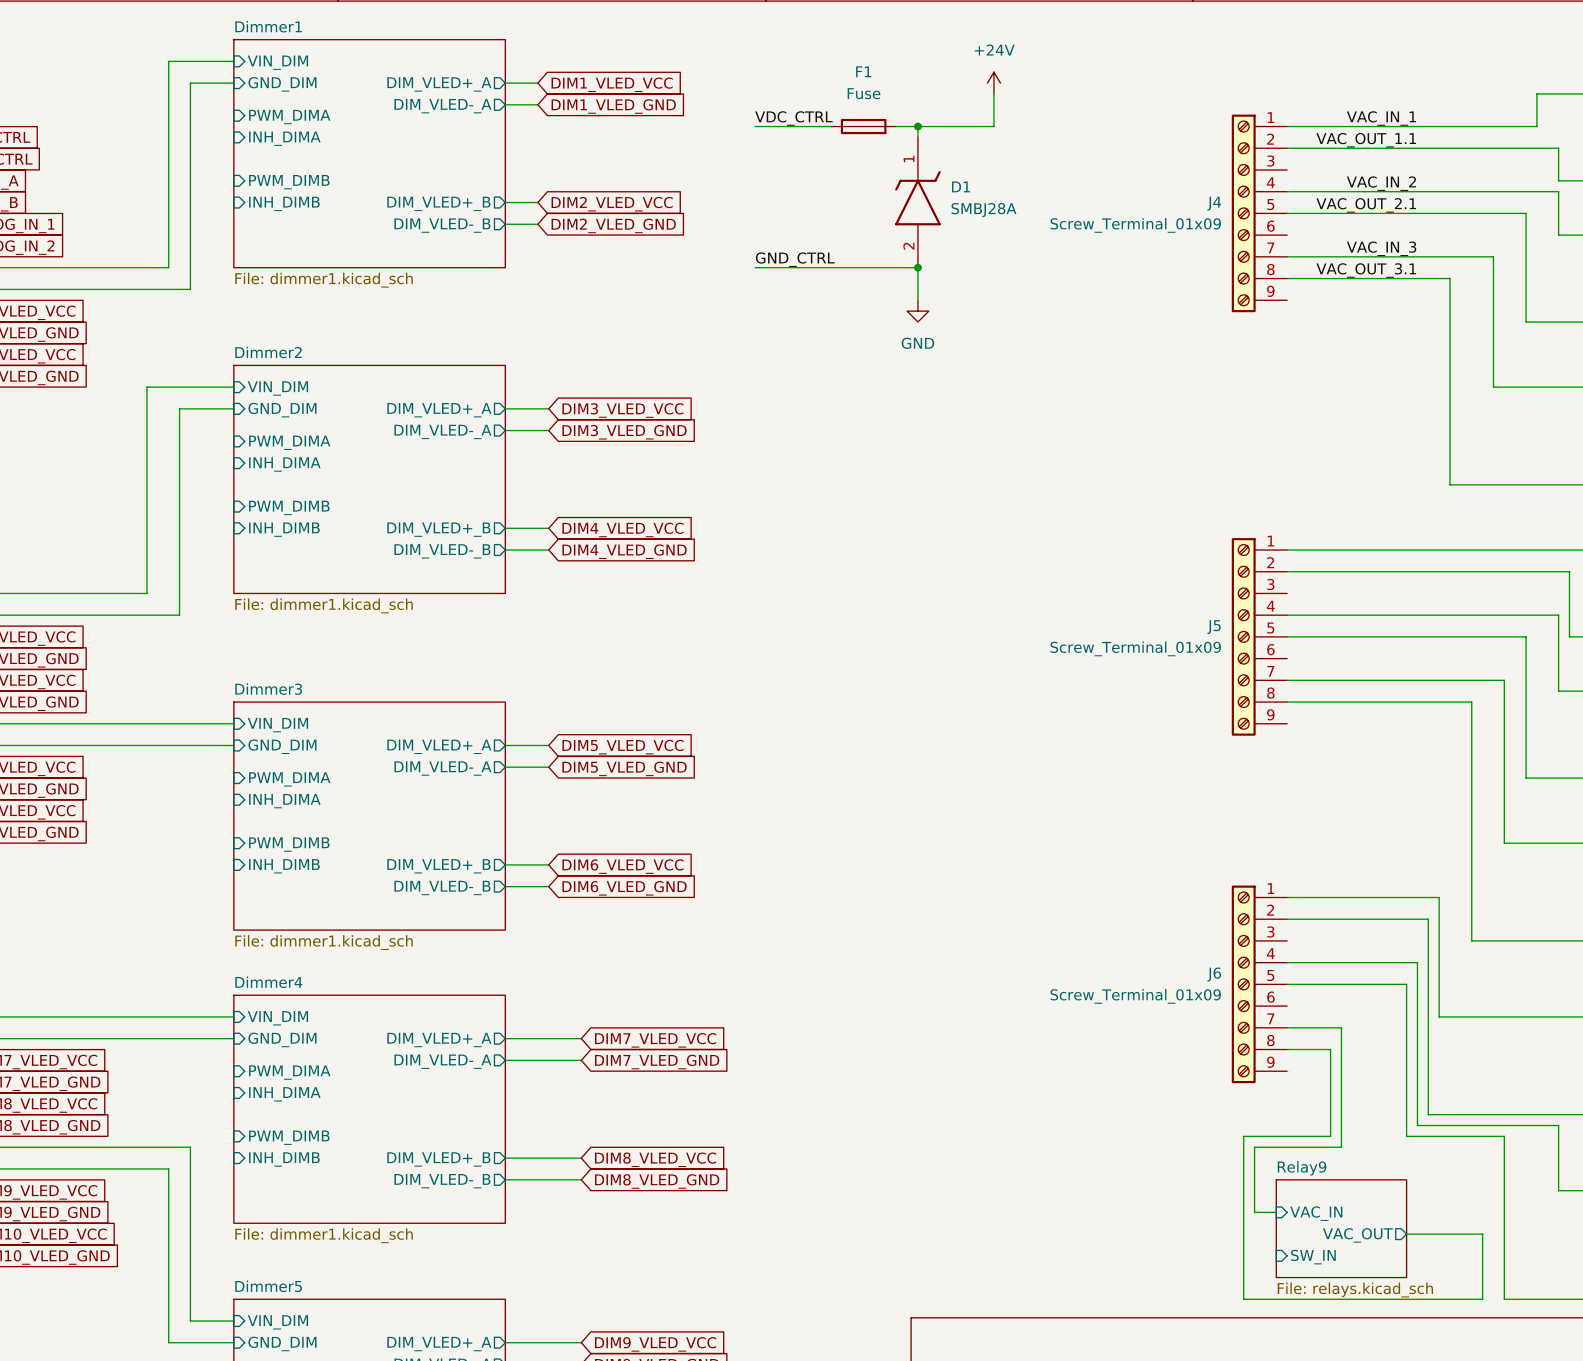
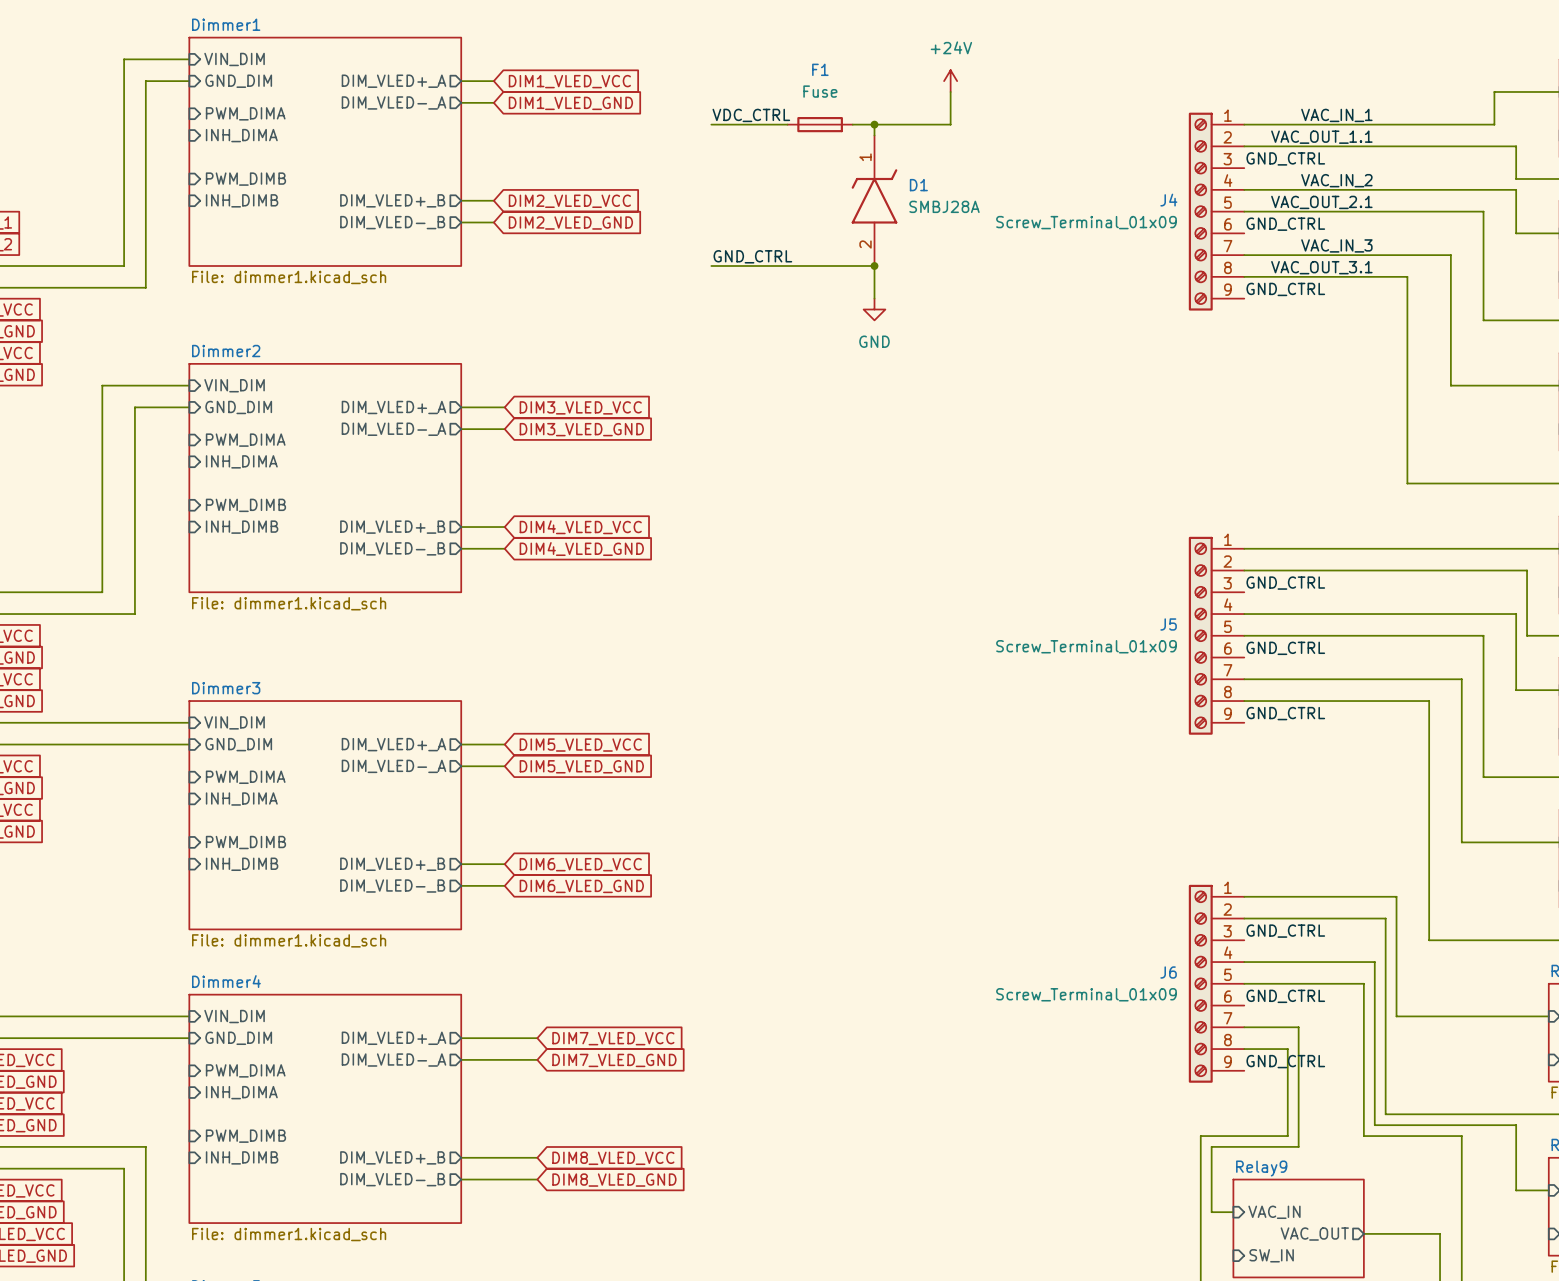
label: none -> GND_CTRL (1285, 158)
label: none -> GND_CTRL (1285, 224)
label: none -> GND_CTRL (1285, 289)
label: none -> GND_CTRL (1285, 583)
label: none -> GND_CTRL (1285, 648)
label: none -> GND_CTRL (1285, 713)
label: none -> GND_CTRL (1285, 931)
label: none -> GND_CTRL (1285, 996)
label: none -> GND_CTRL (1285, 1061)

